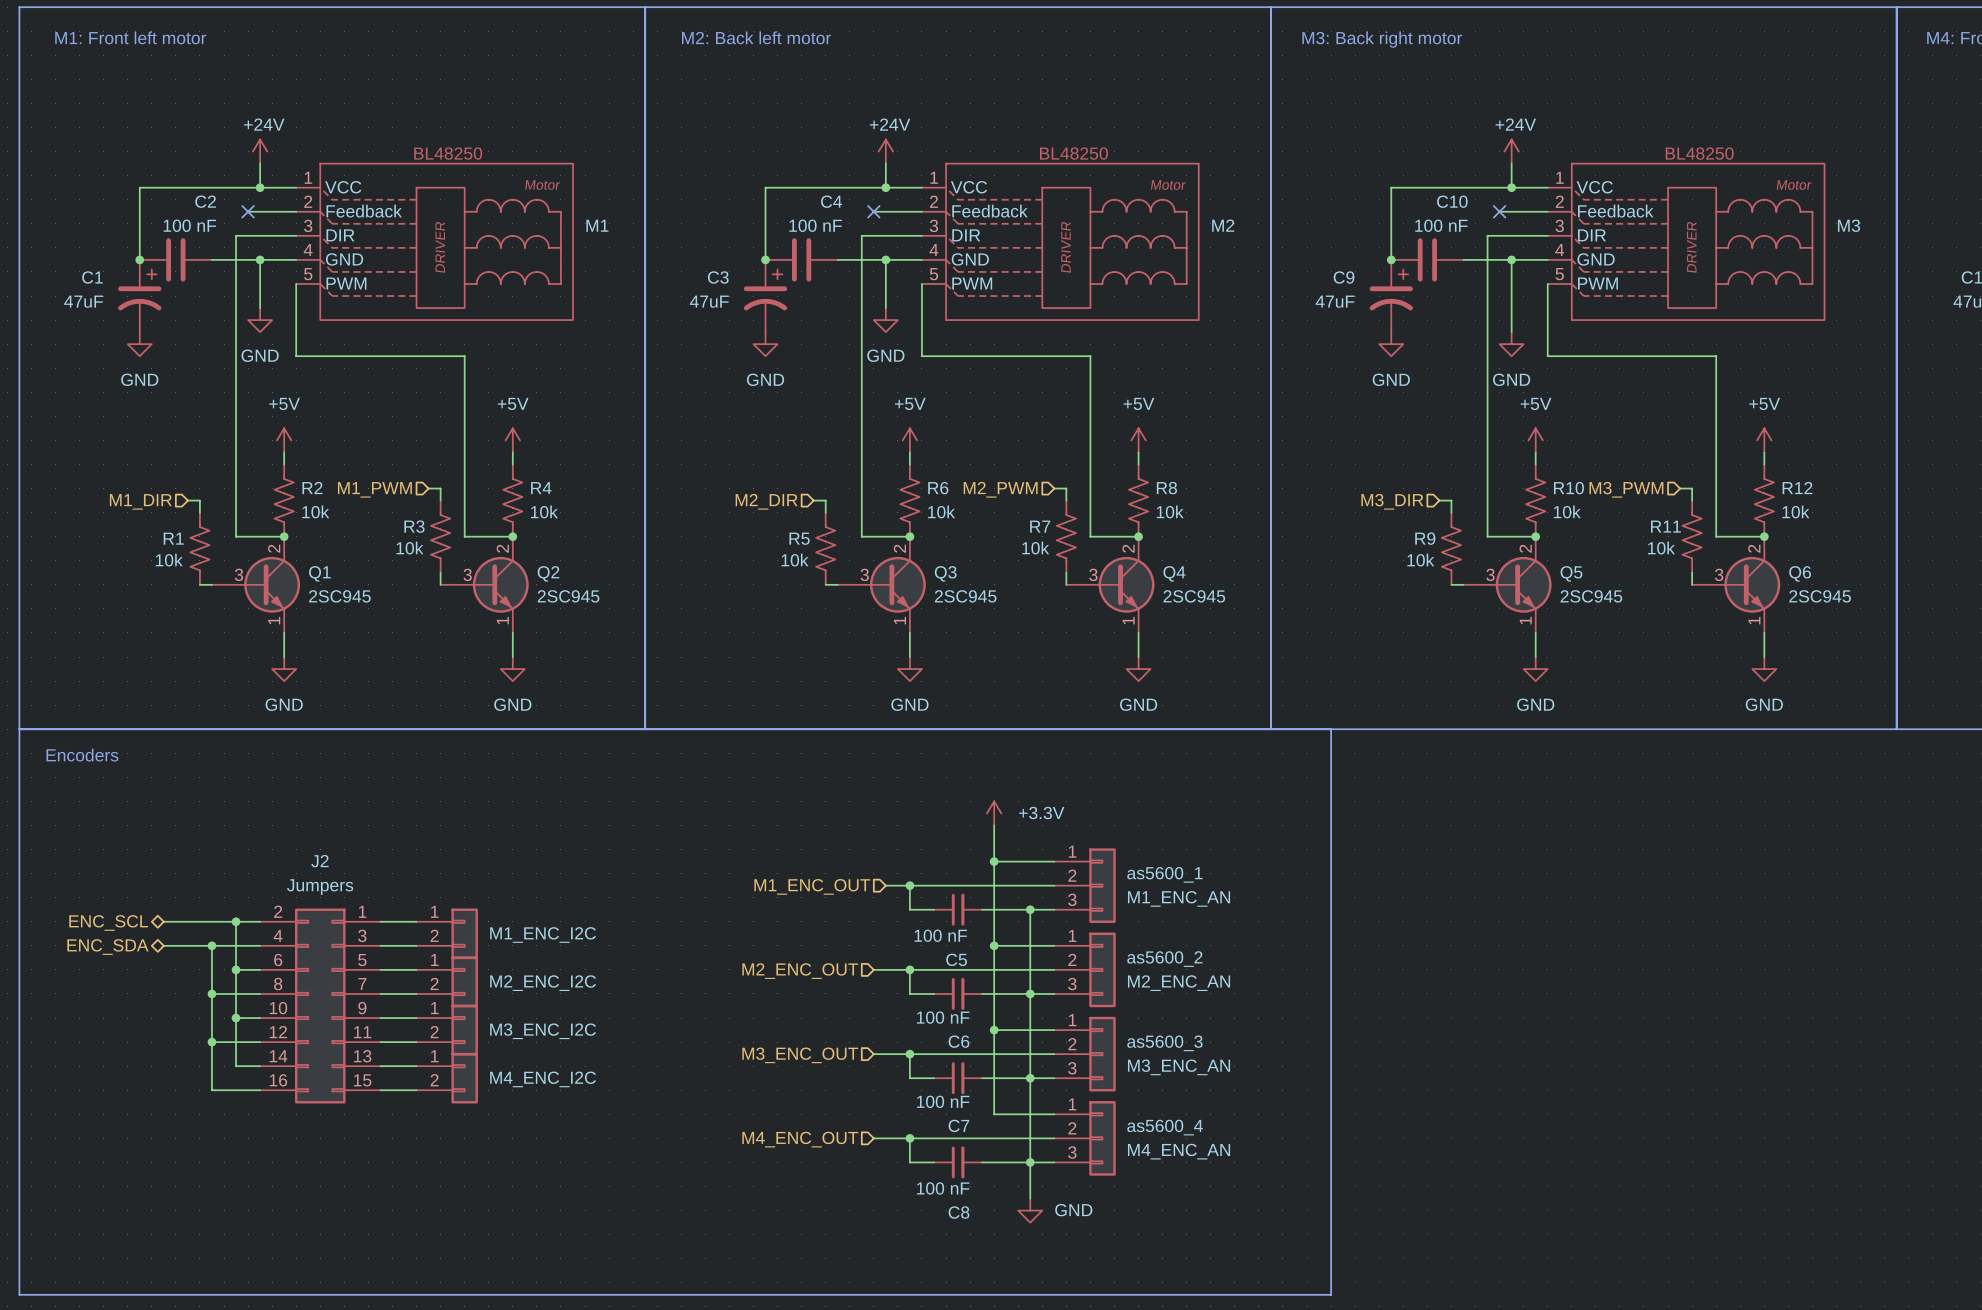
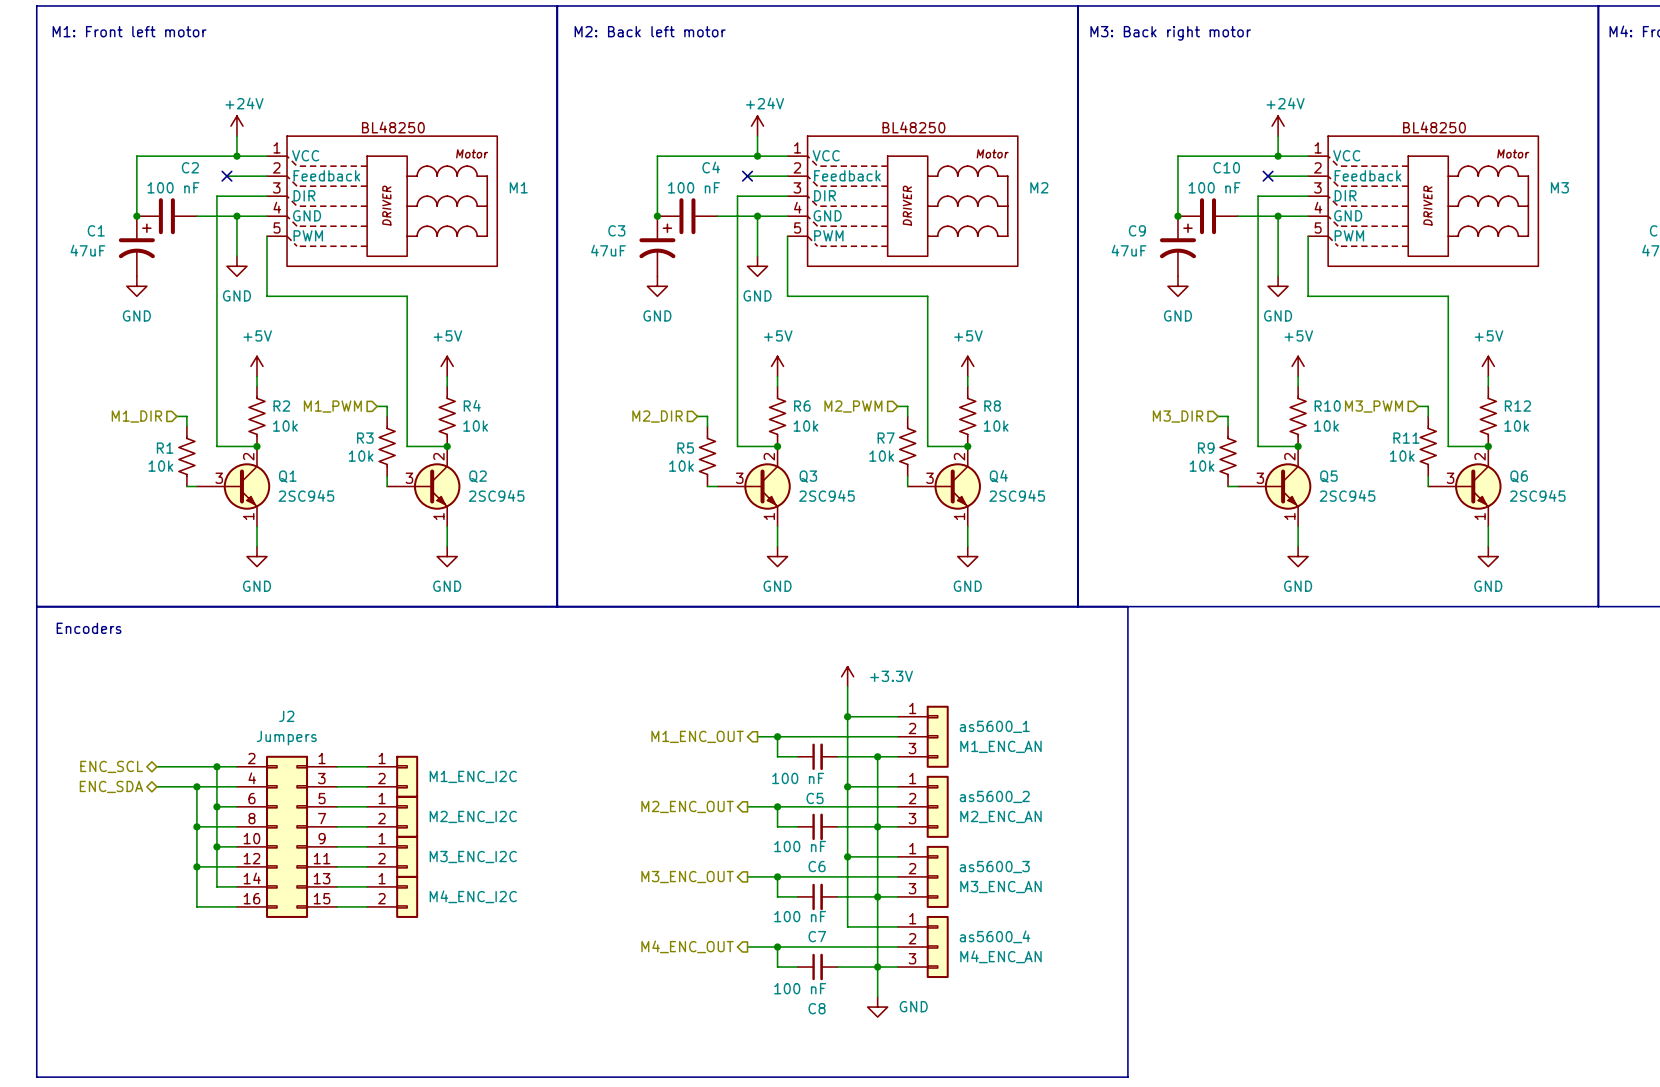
hierarchical label shape: input (812, 886) -> output (697, 736)
hierarchical label shape: input (800, 971) -> output (687, 806)
hierarchical label shape: input (800, 1055) -> output (687, 877)
hierarchical label shape: input (800, 1139) -> output (687, 946)

